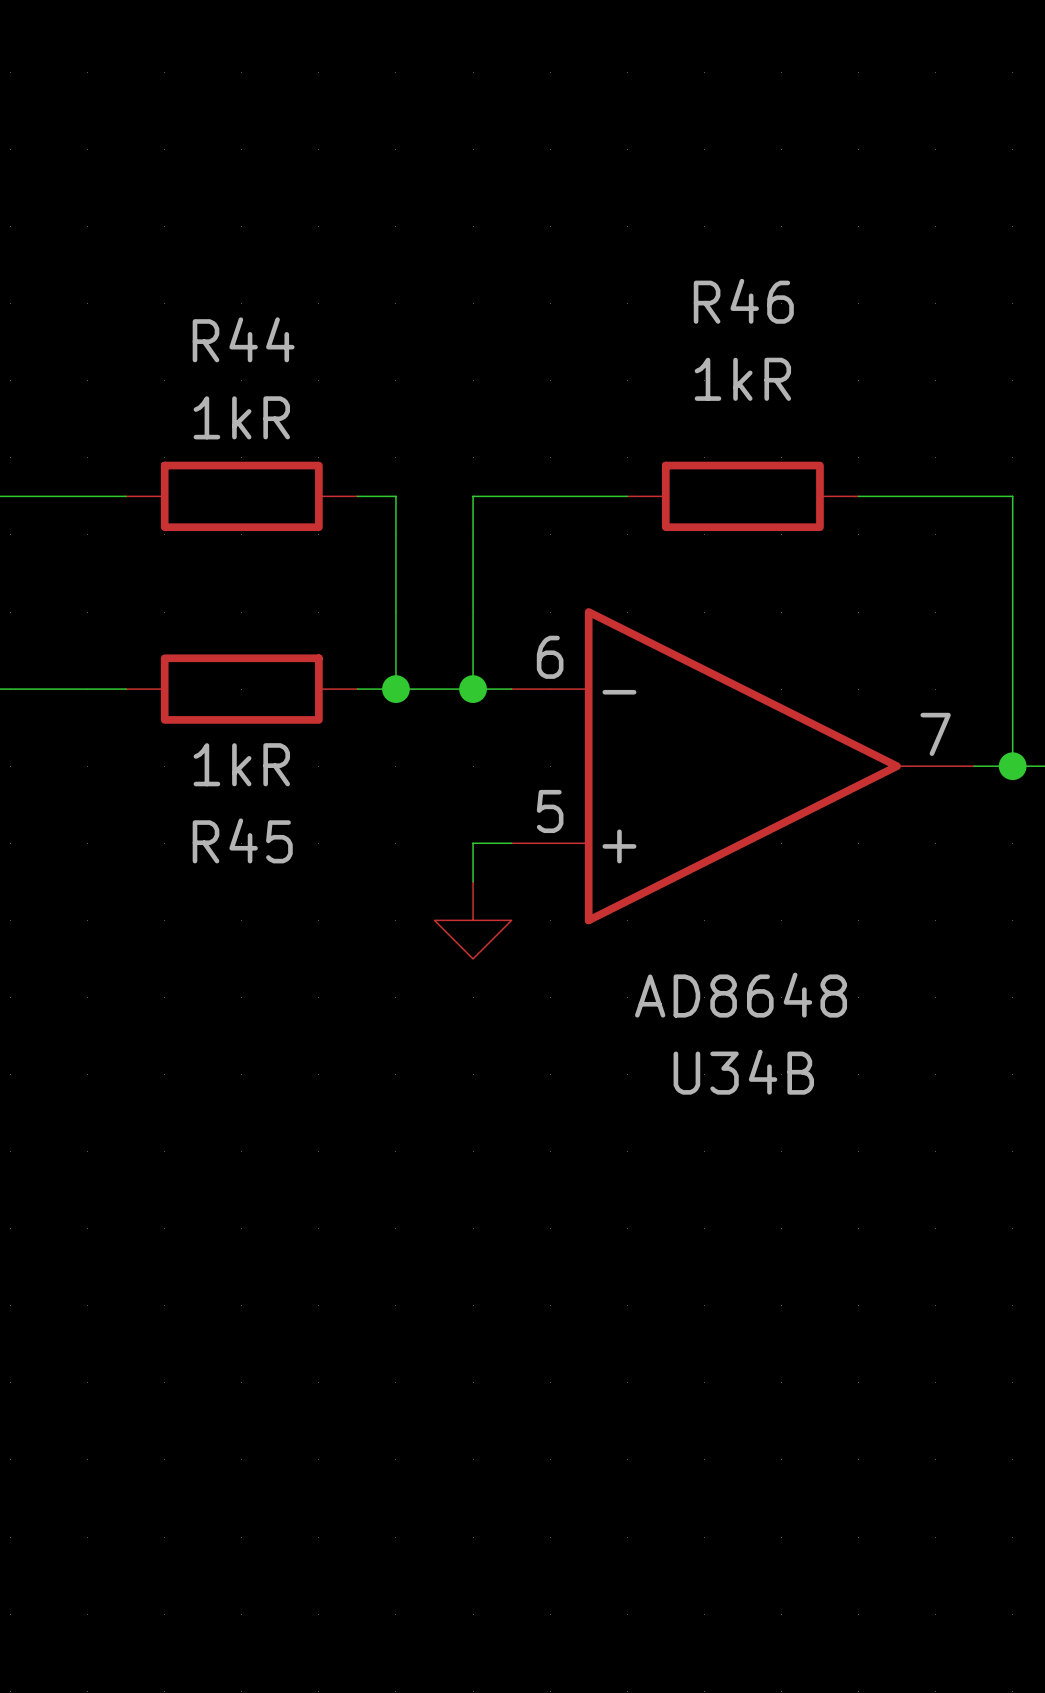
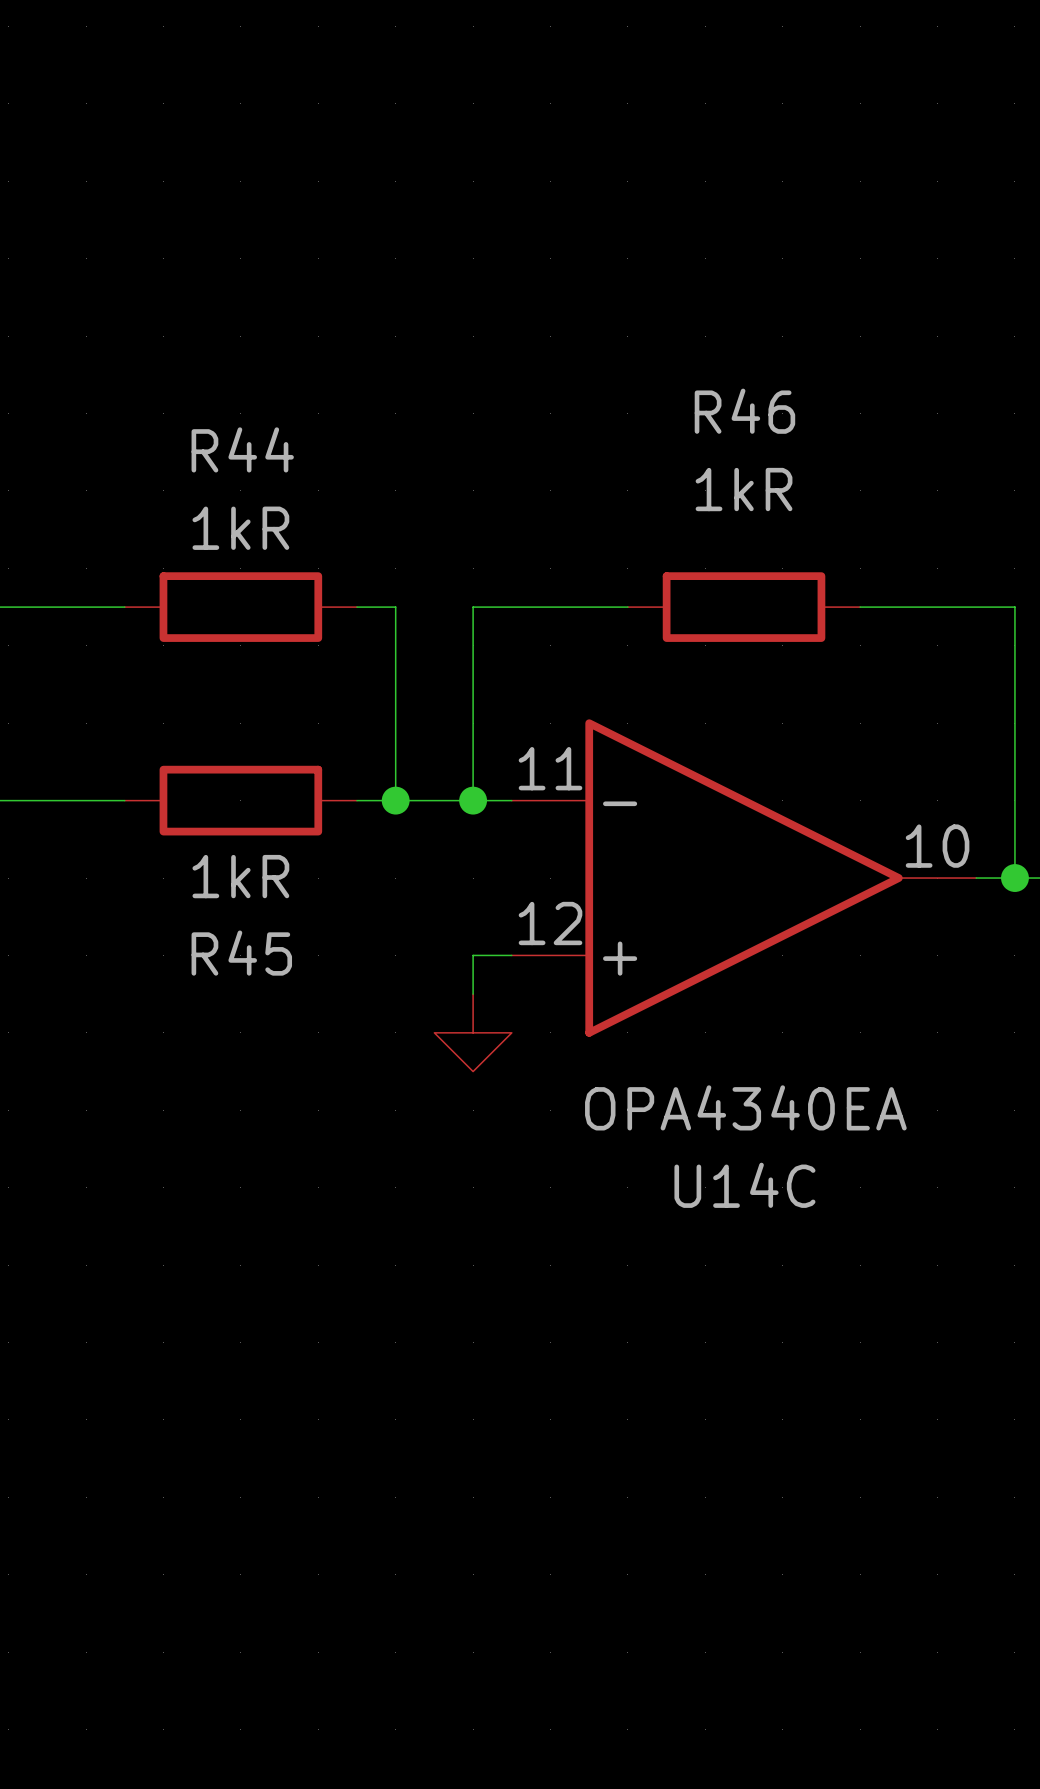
U34B pin number: 6 (550, 657) -> 11 (550, 768)
U34B pin number: 7 (935, 734) -> 10 (937, 846)
U34B pin number: 5 (550, 811) -> 12 (550, 923)
U34B value: AD8648 (741, 995) -> OPA4340EA (745, 1107)
U34B name: U34B (743, 1072) -> U14C (744, 1185)

